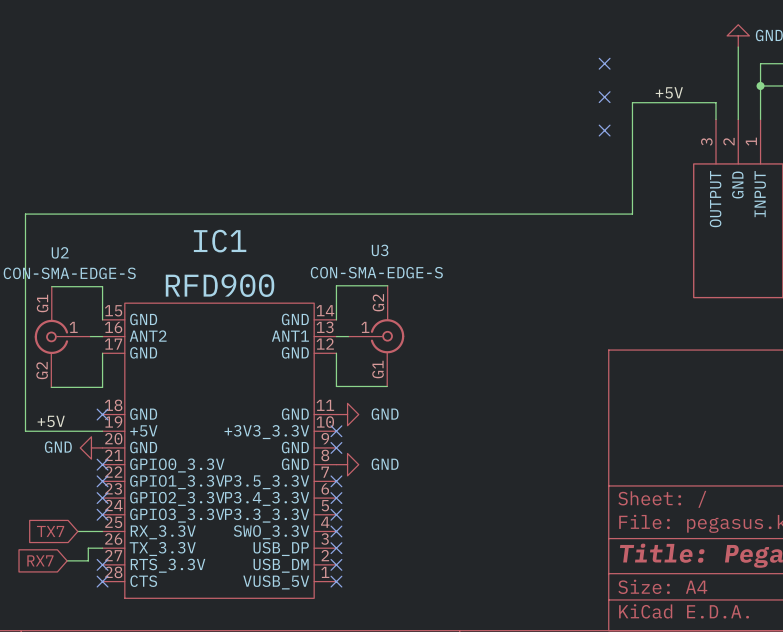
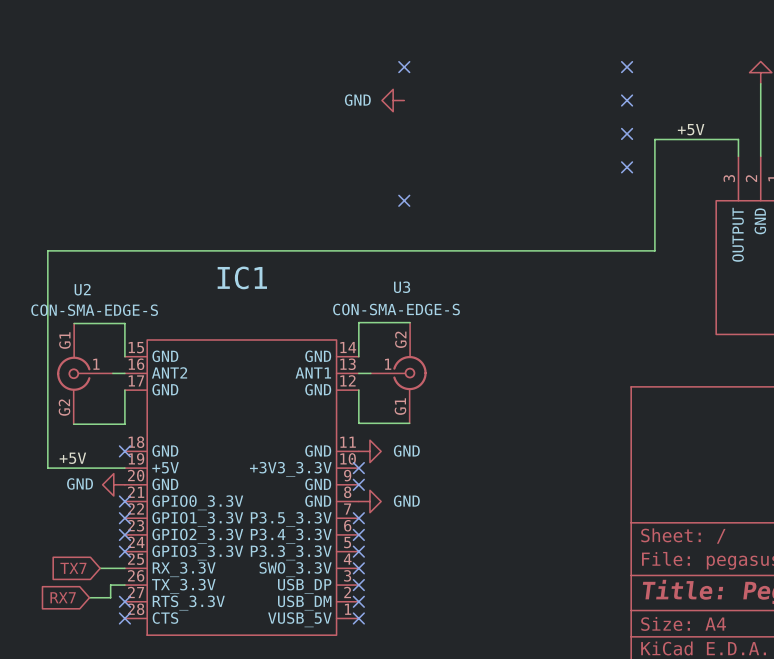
no-connect mark: none -> (404, 67)
no-connect mark: none -> (627, 67)
power symbol: none -> GND (393, 100)
no-connect mark: none -> (404, 200)
IC1 value: RFD900 (220, 285) -> none

